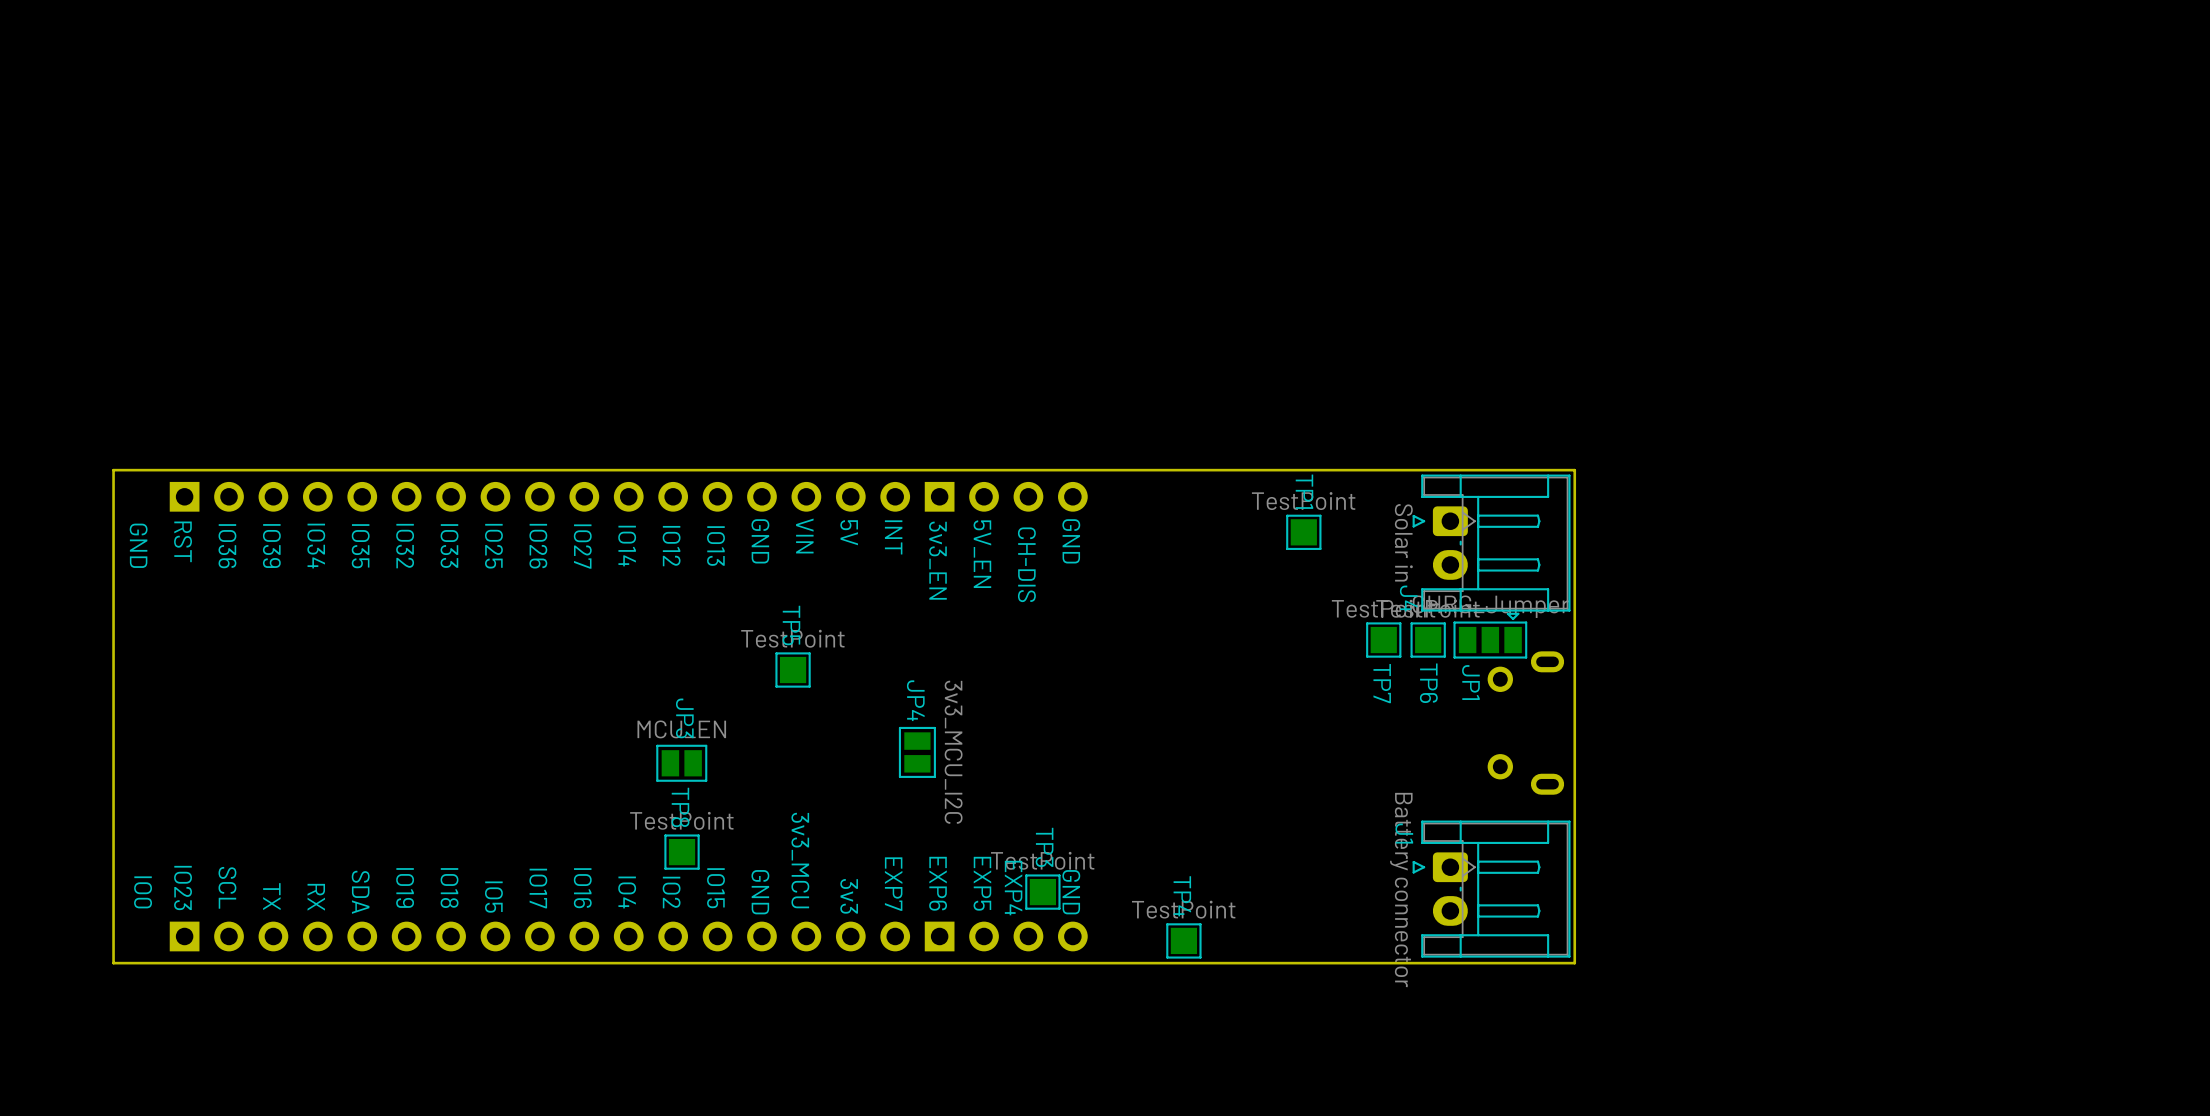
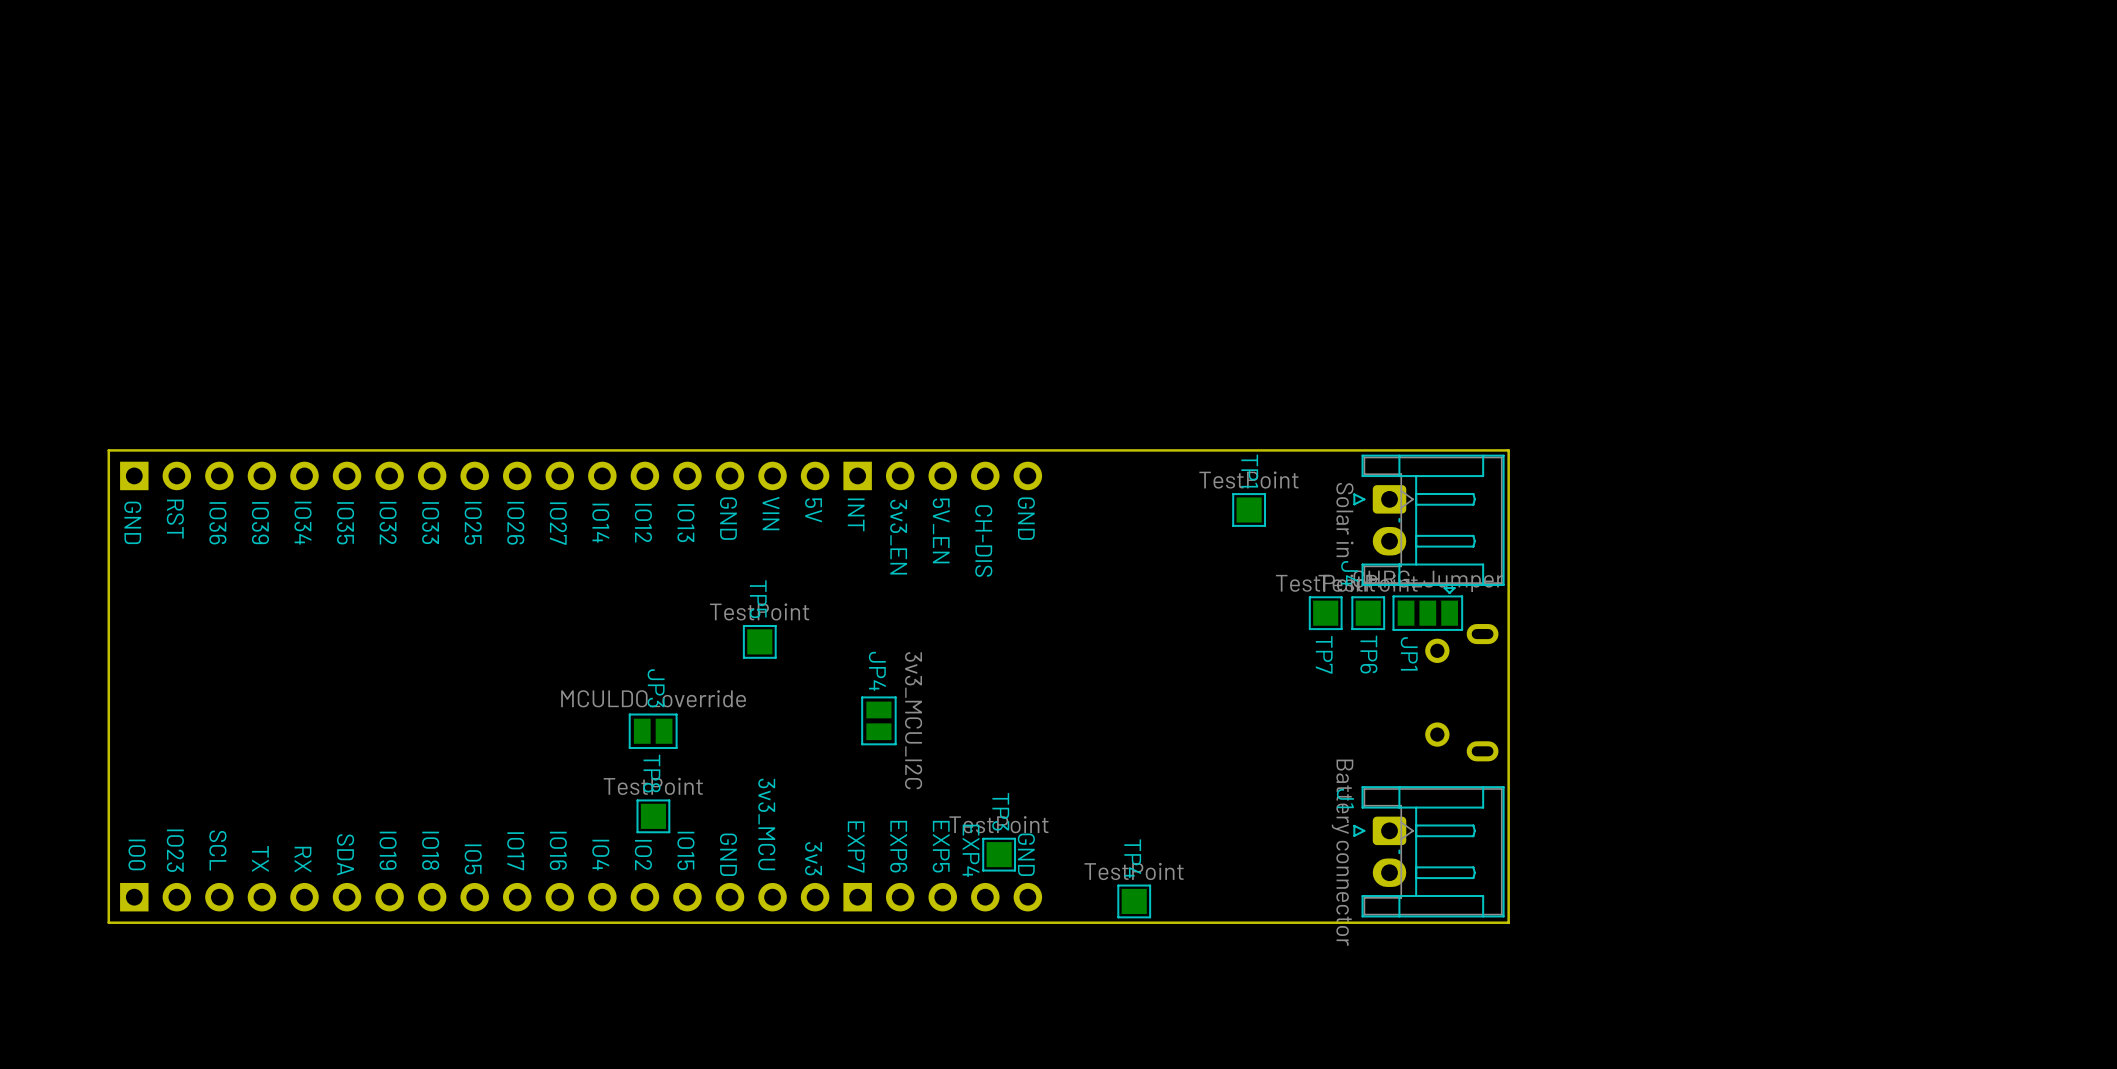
part position: (539, 496) -> (474, 475)
part: none -> (942, 475)
part: (1006, 496) -> none
JP3 value: MCU_EN (681, 729) -> MCULDO_override (653, 698)
part position: (539, 936) -> (474, 897)
part: none -> (942, 897)
part: (1006, 936) -> none

